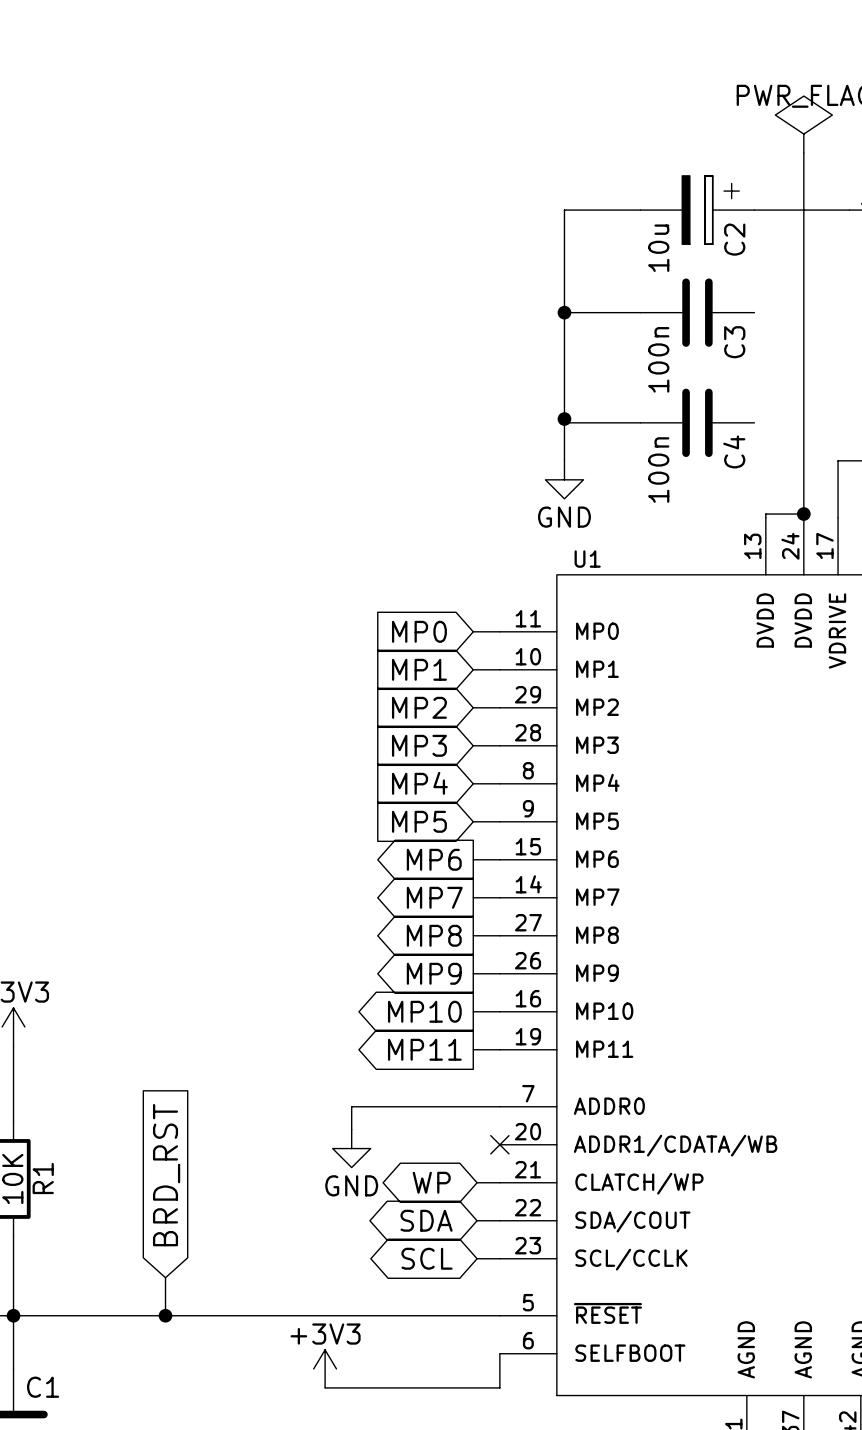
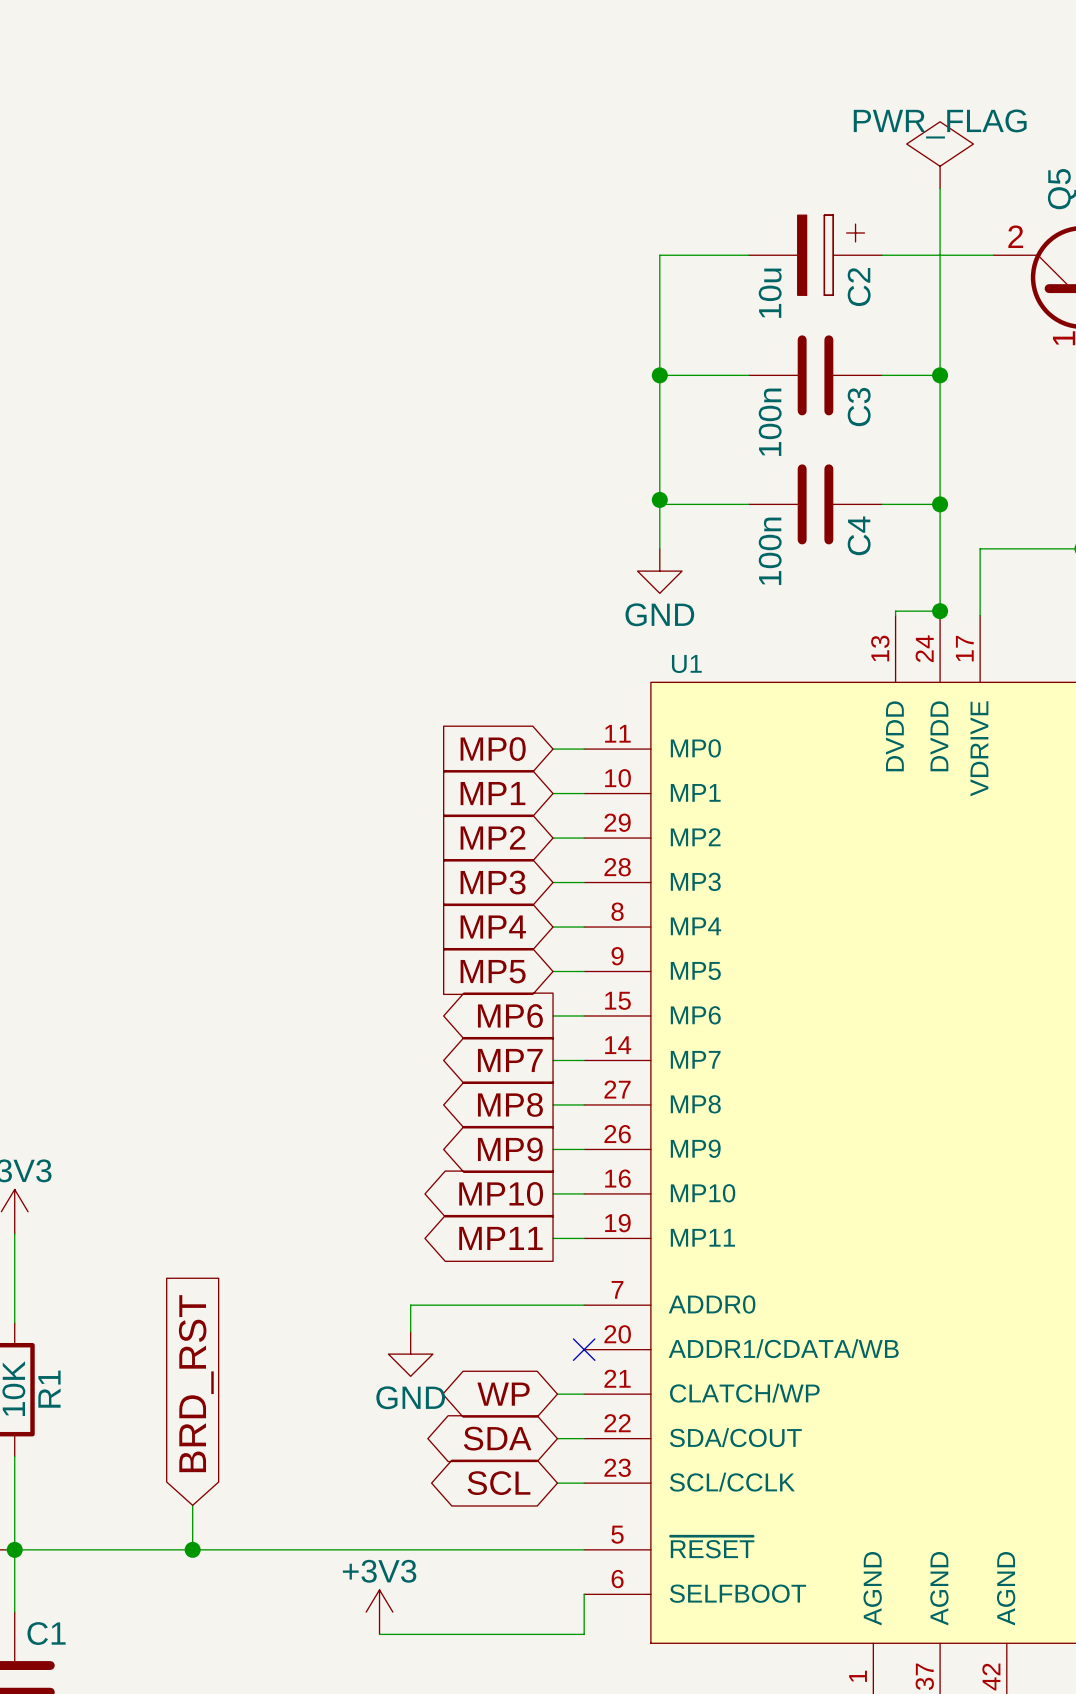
wire: none -> (882, 375) (940, 375)
junction: none -> (940, 375)
wire: none -> (882, 504) (940, 504)
junction: none -> (940, 504)

